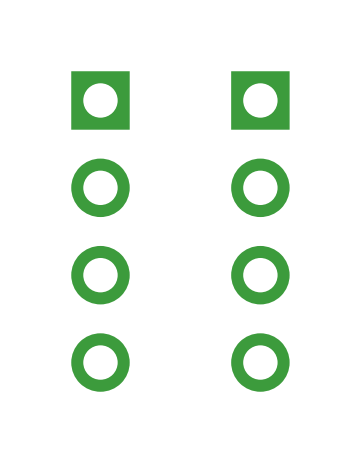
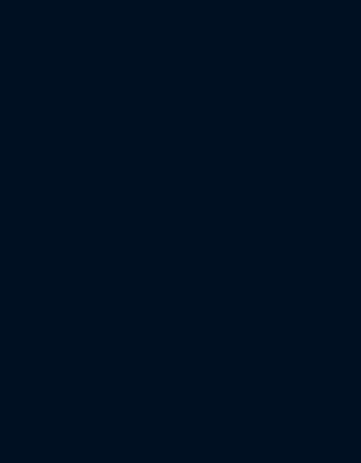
part: (100, 231) -> none
part: (260, 231) -> none

